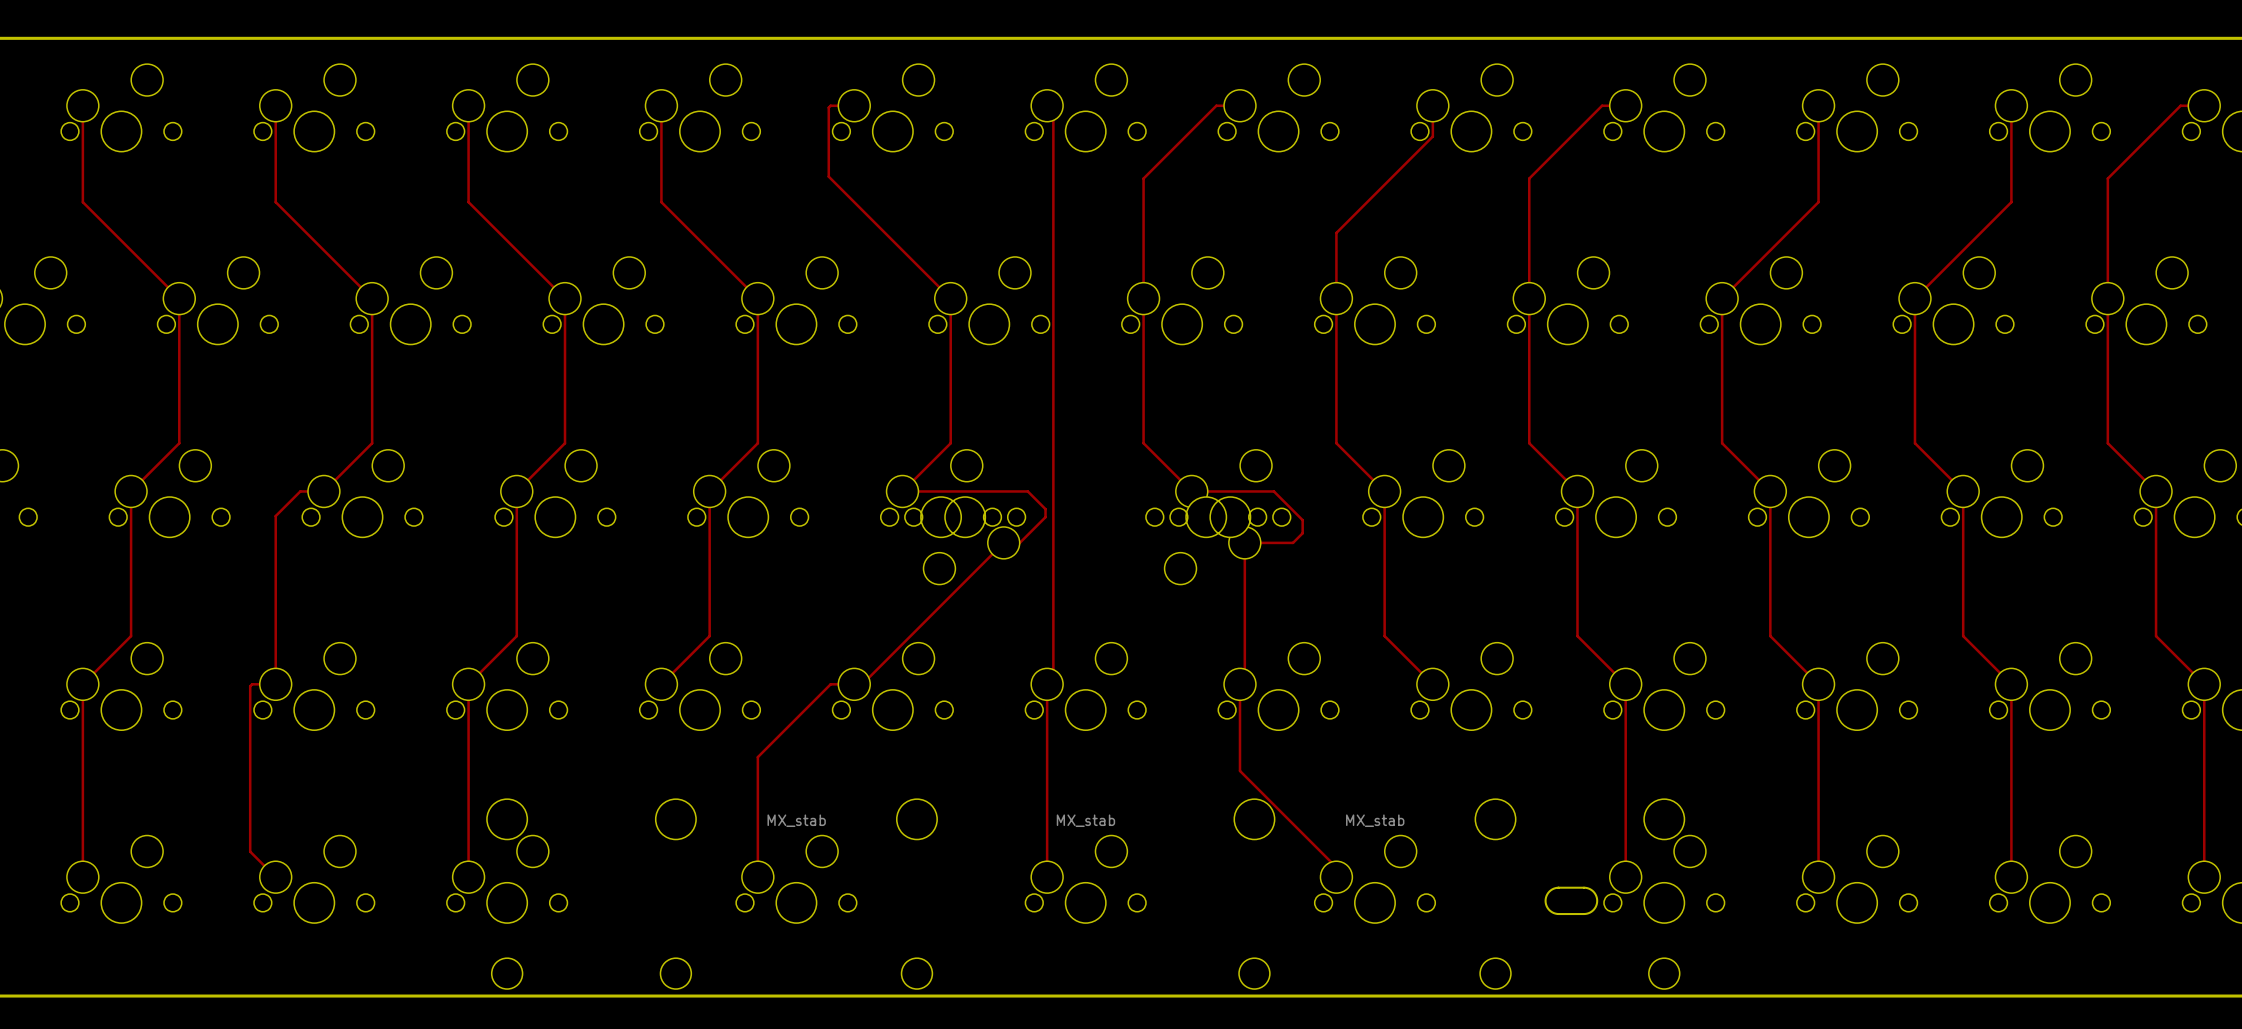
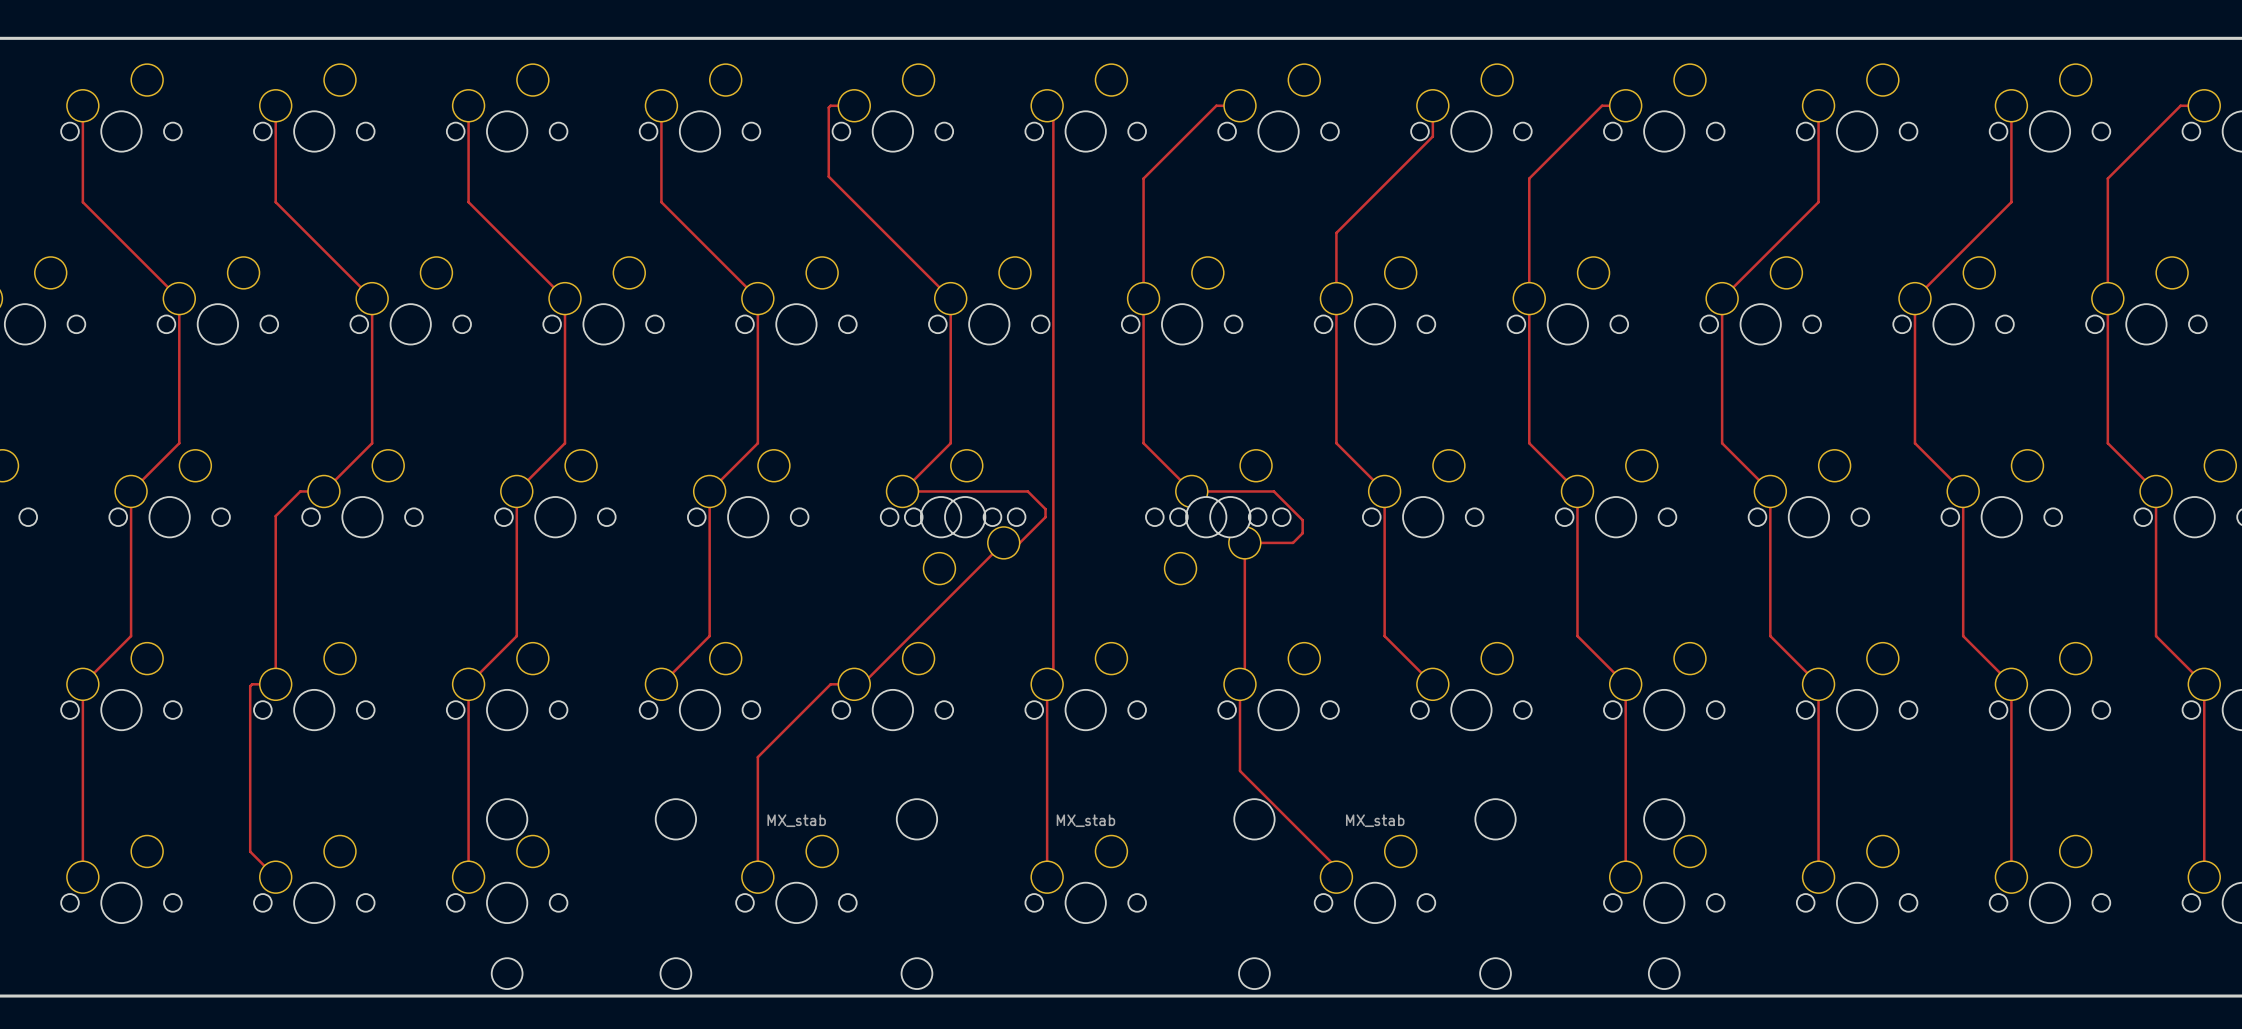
board edge: (1558, 887) (1584, 887) (1590, 889) (1596, 896) (1595, 906) (1591, 911) (1585, 913) (1552, 912) (1546, 905) (1546, 897) (1550, 890) (1555, 888) (1557, 887) (1558, 887) -> none

